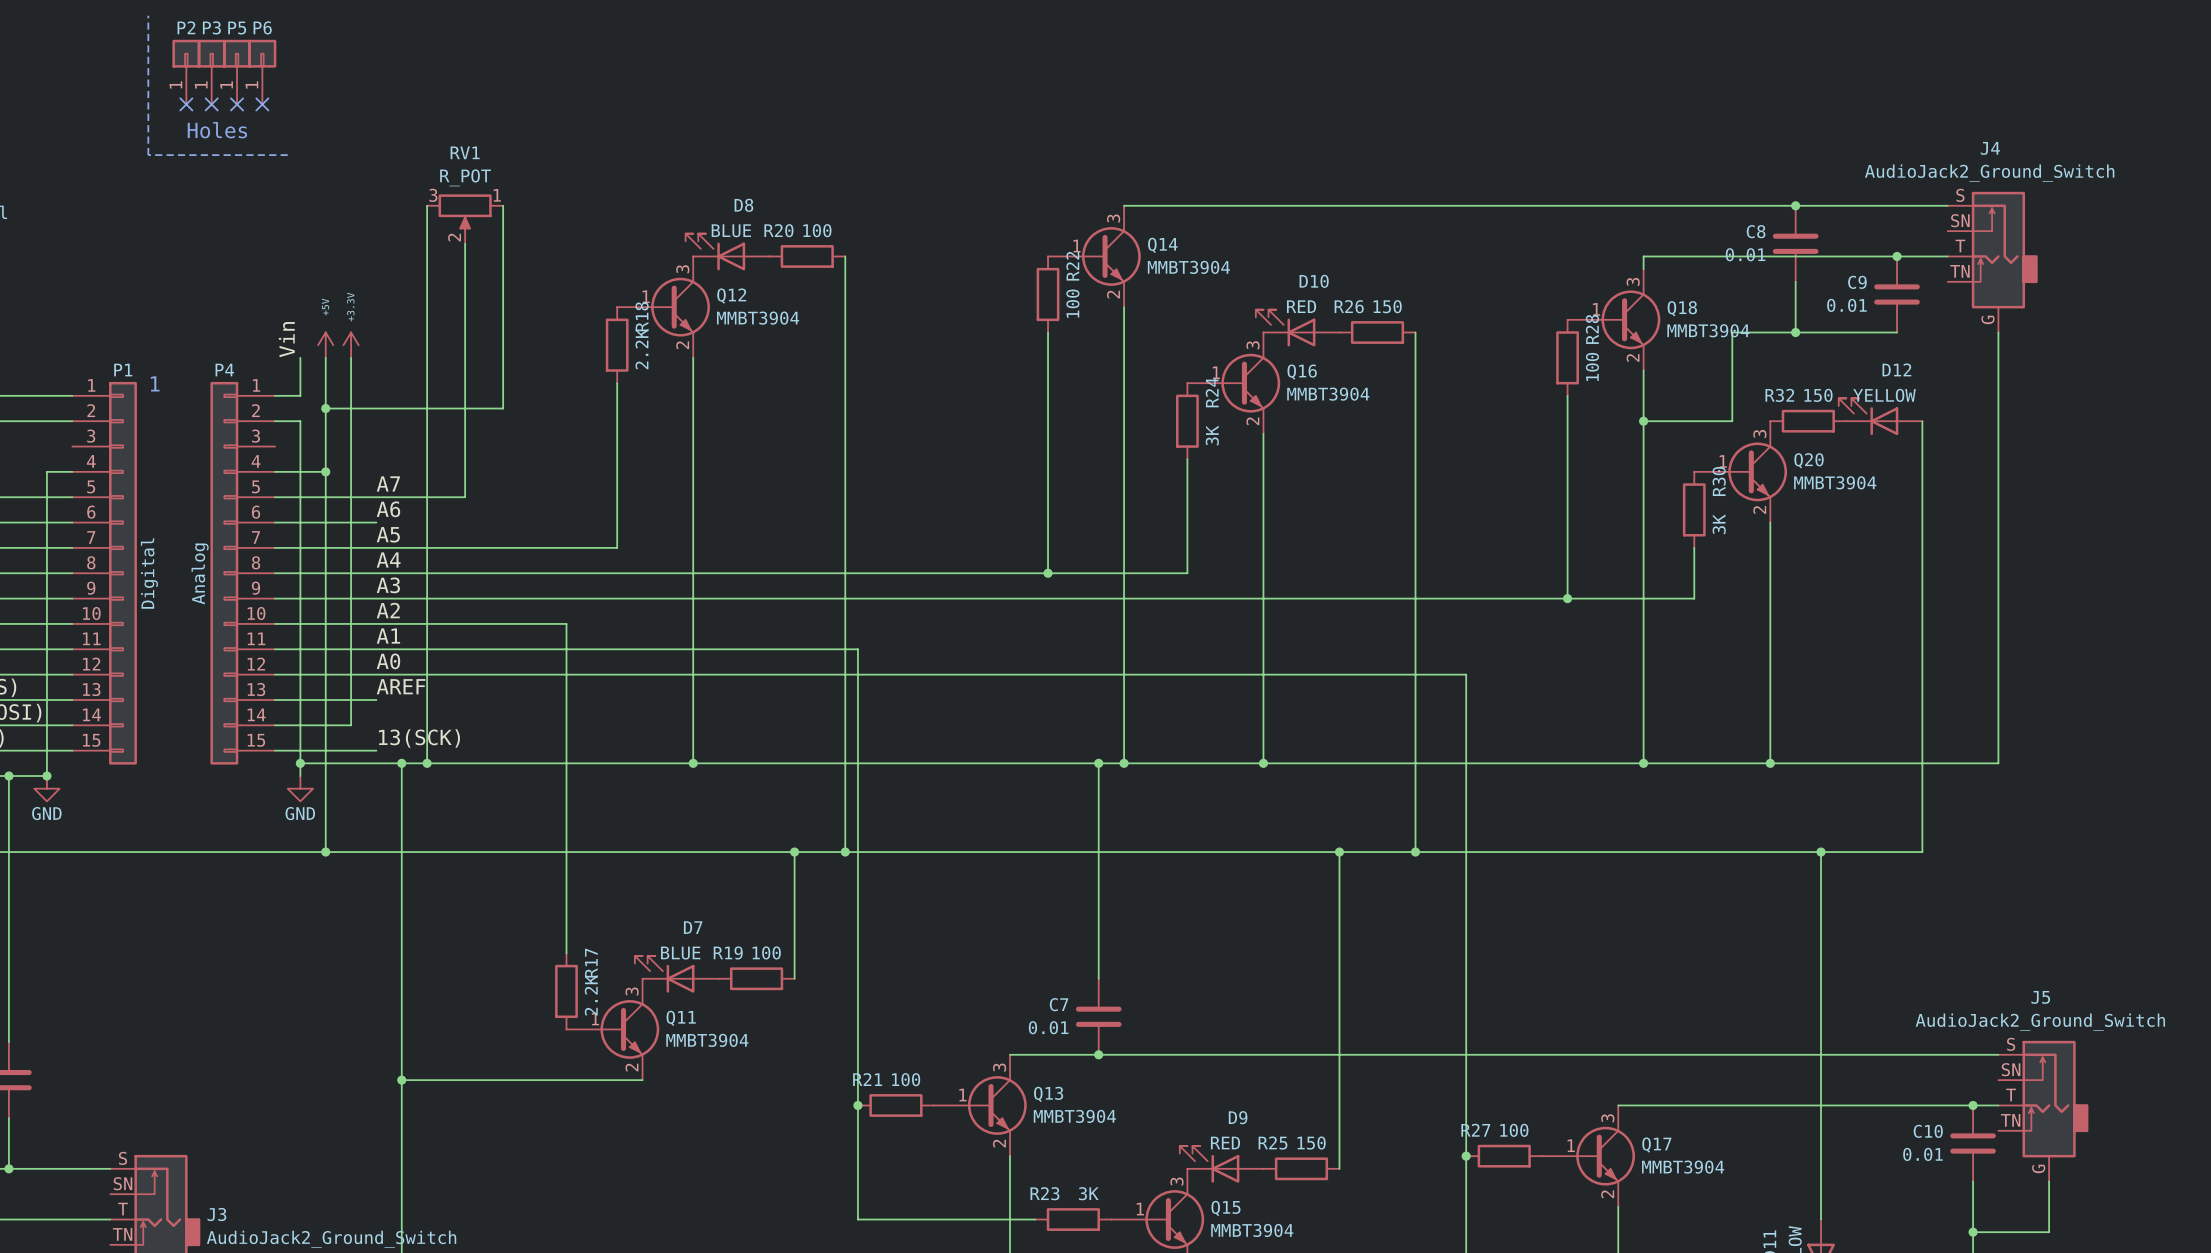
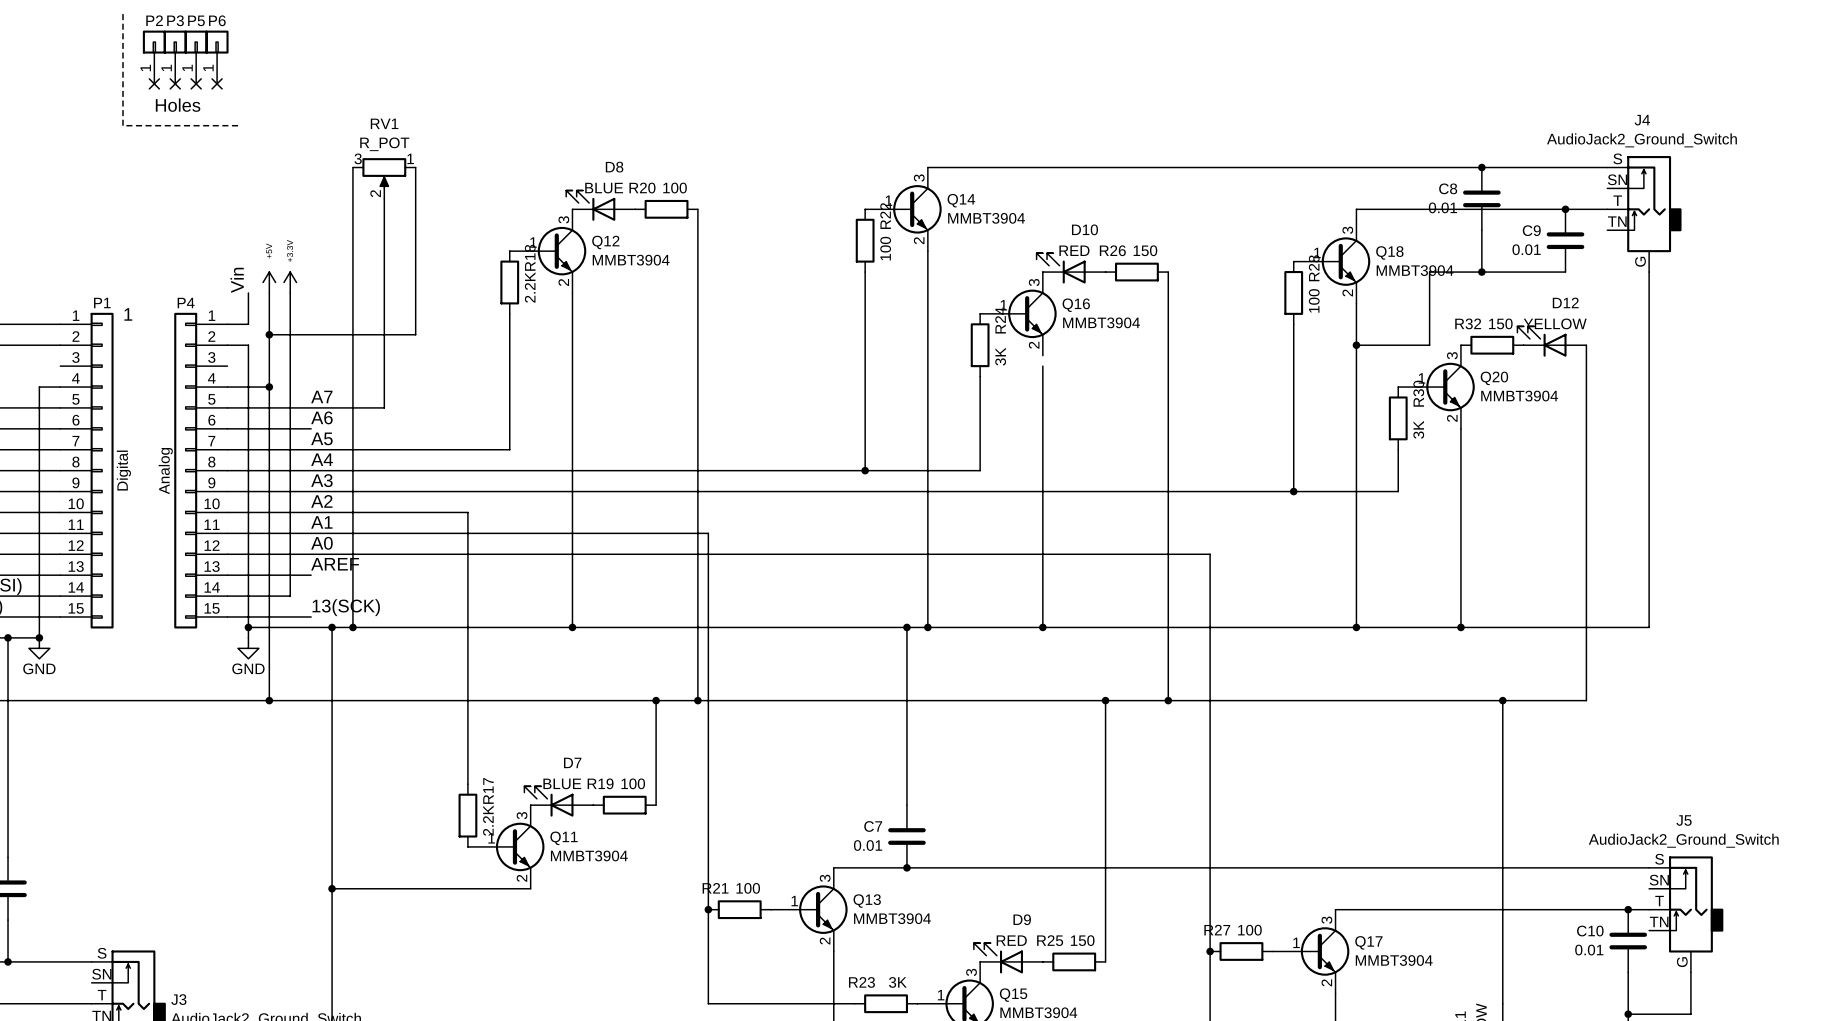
wire: (1263, 433) (1263, 446) -> none

